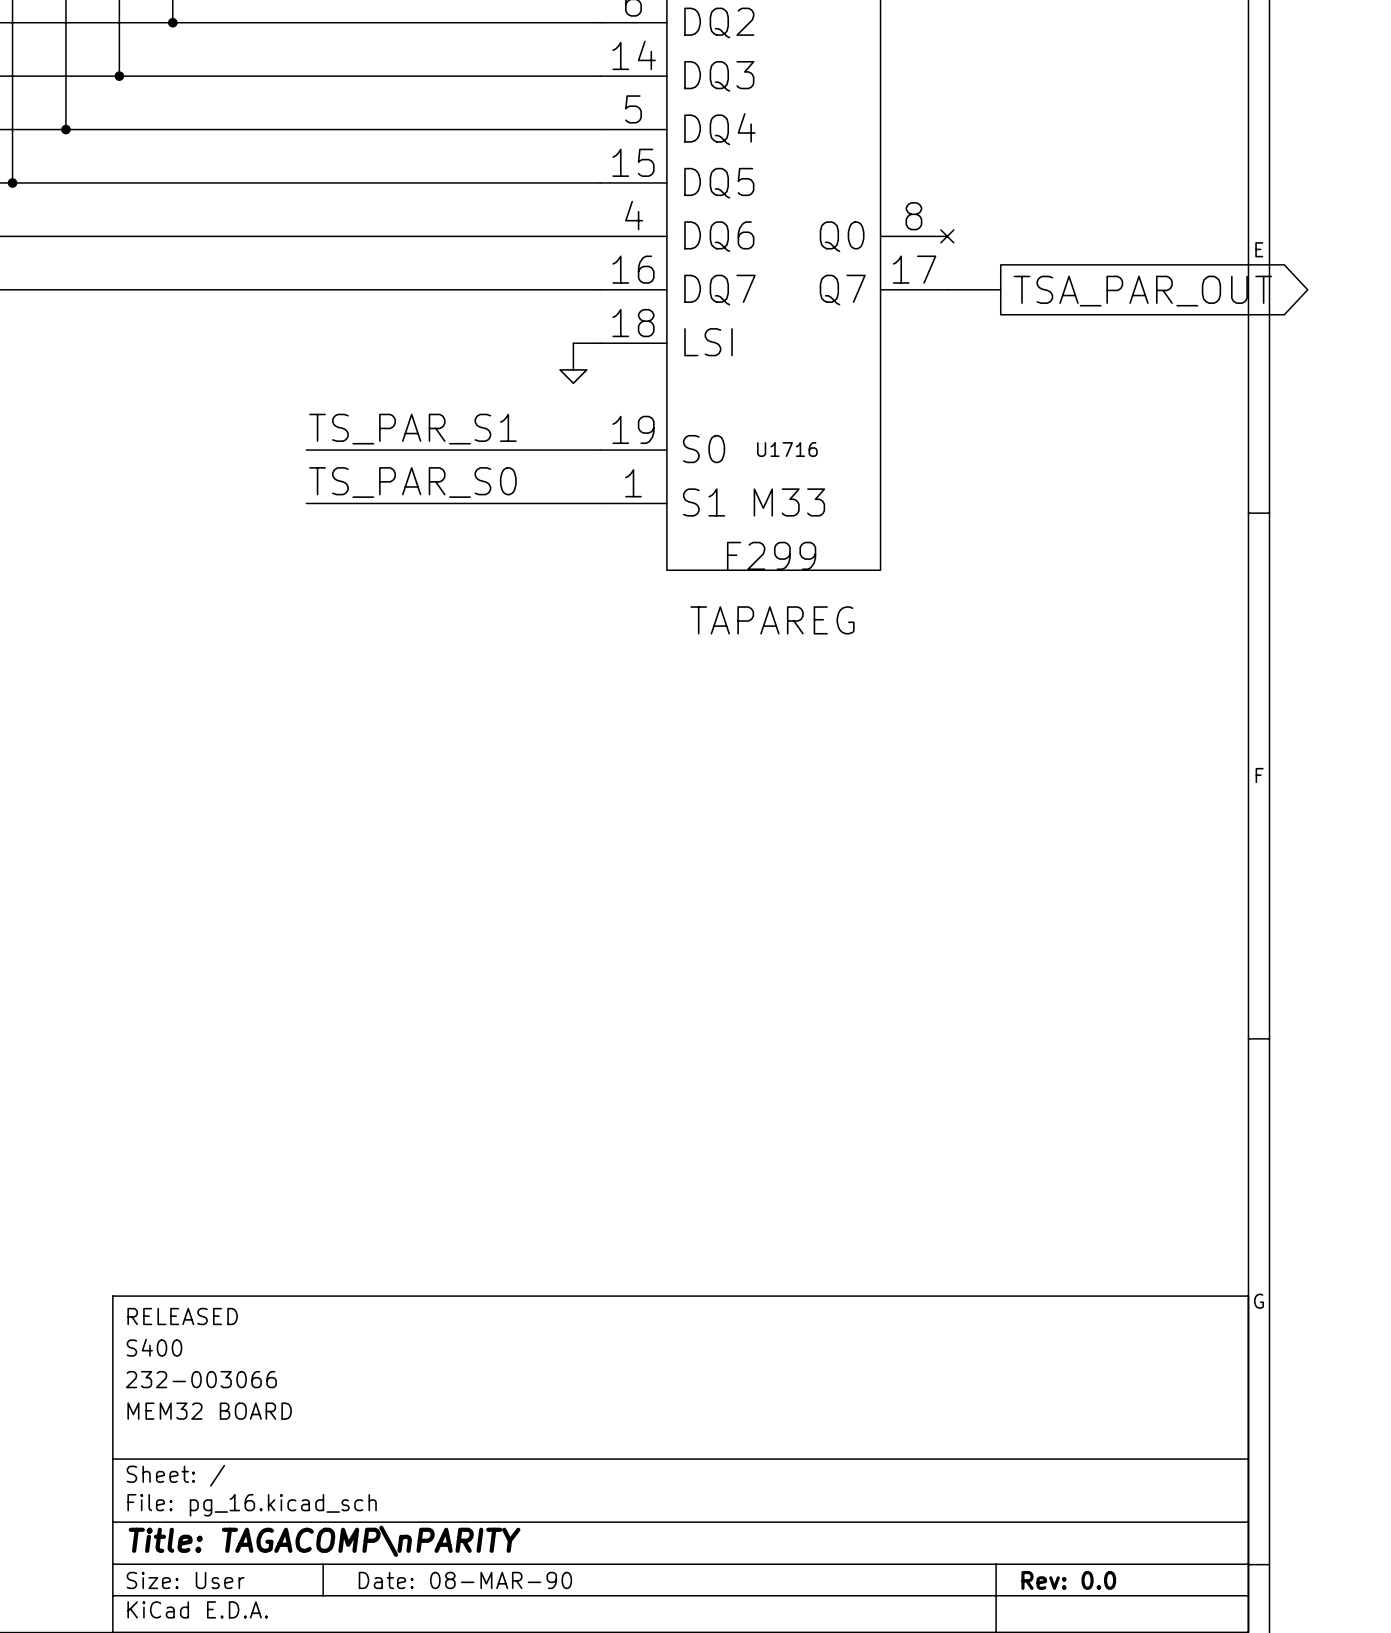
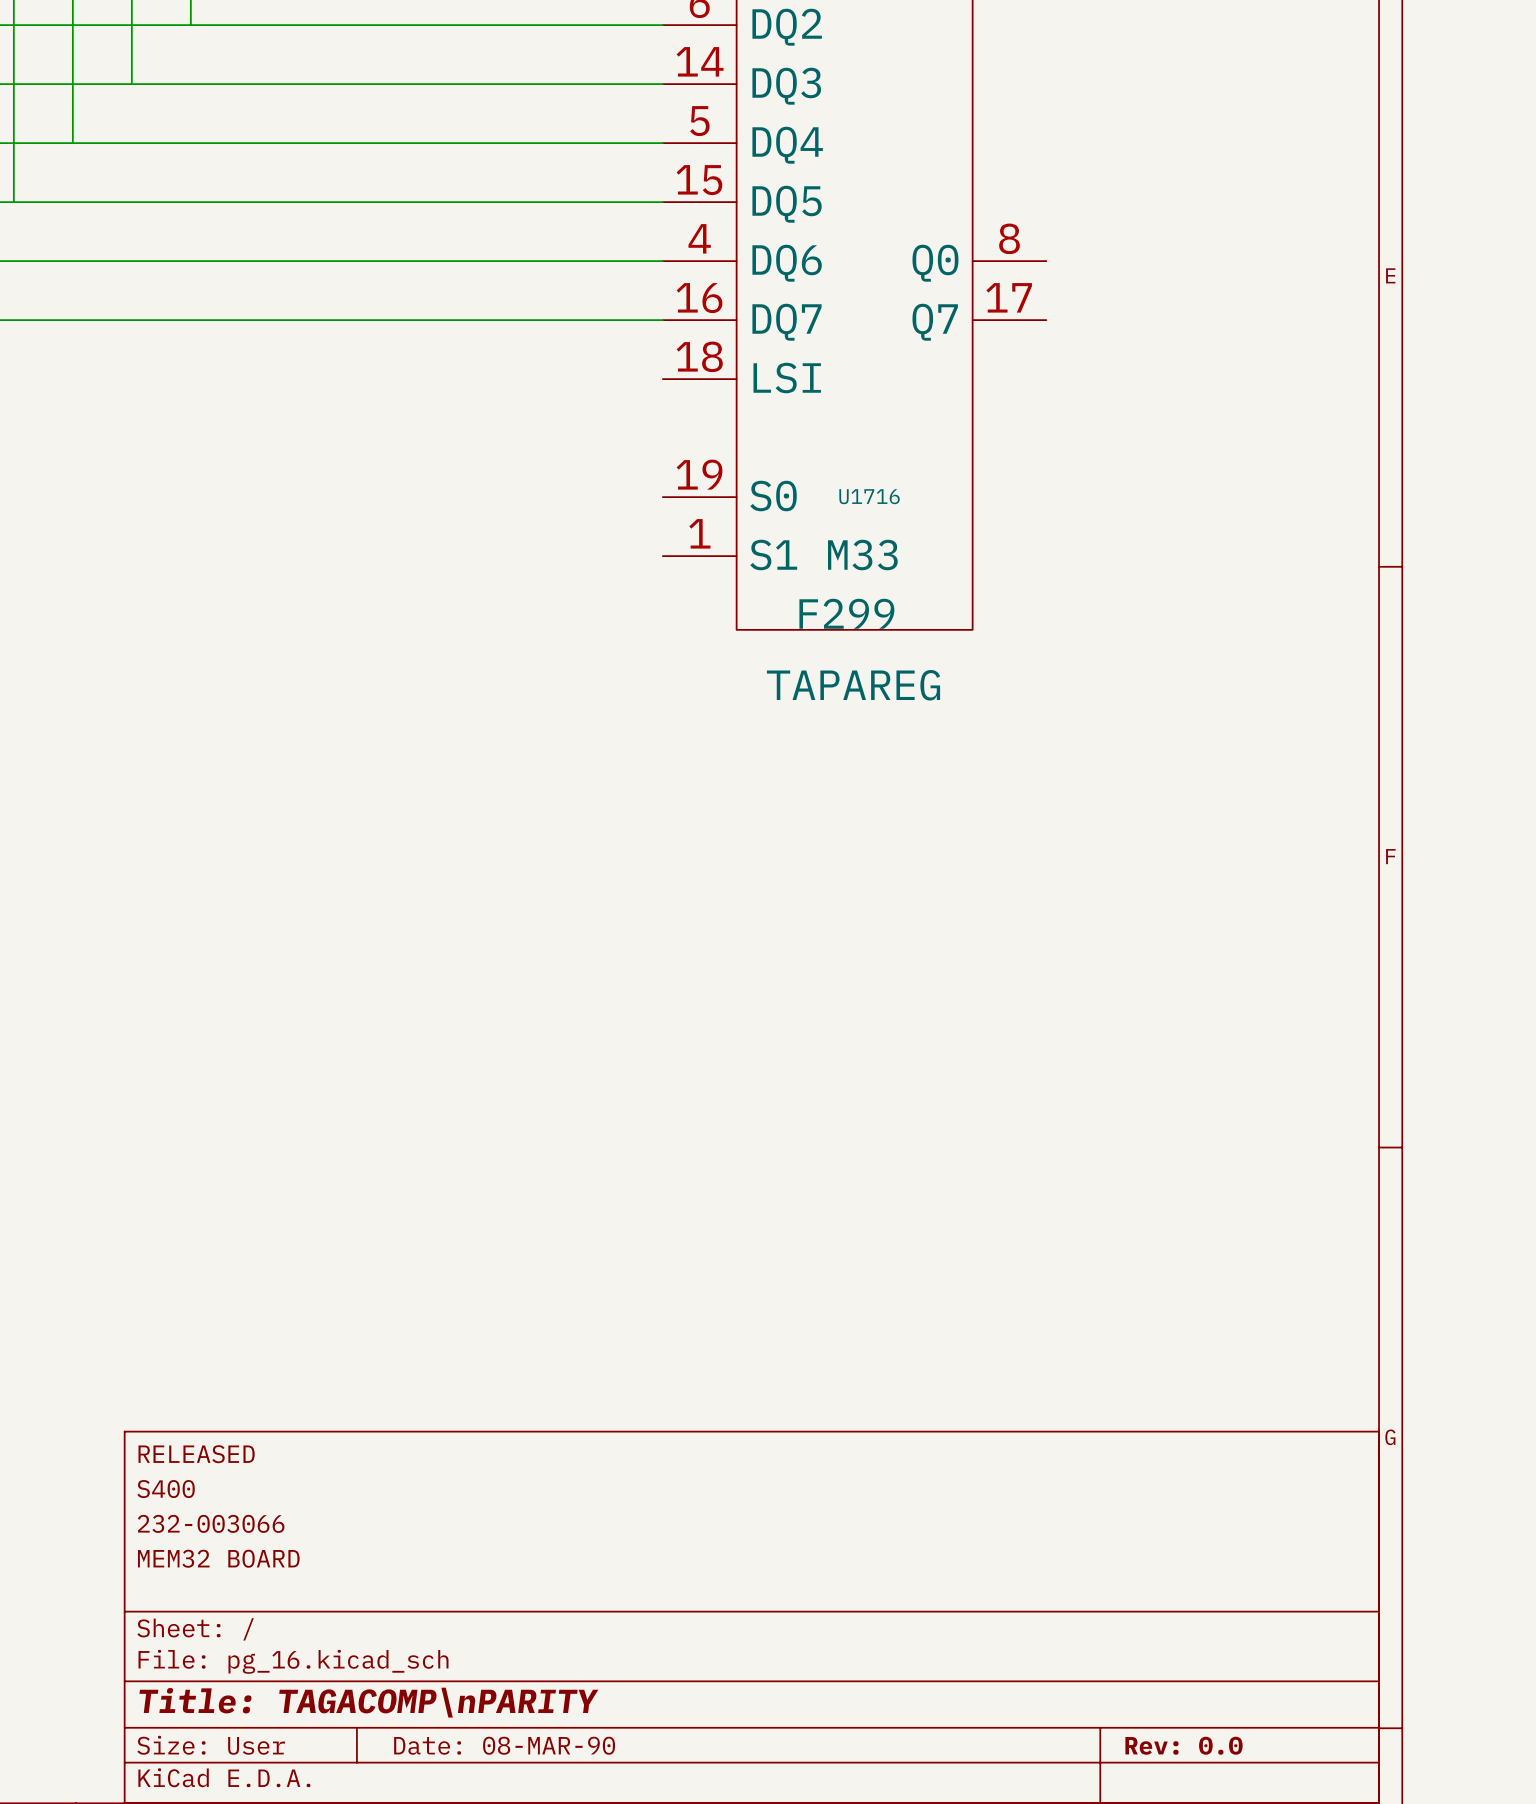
junction: (172, 22) -> none
junction: (119, 76) -> none
junction: (65, 129) -> none
junction: (12, 182) -> none
no-connect mark: (947, 236) -> none
wire: (947, 289) (1000, 289) -> none
global label: TSA_PAR_OUT (1142, 291) -> none
wire: (573, 343) (600, 343) -> none
power symbol: (573, 363) -> none
label: TS_PAR_S1 (412, 429) -> none
wire: (306, 450) (600, 450) -> none
label: TS_PAR_S0 (412, 482) -> none
wire: (306, 503) (600, 503) -> none

